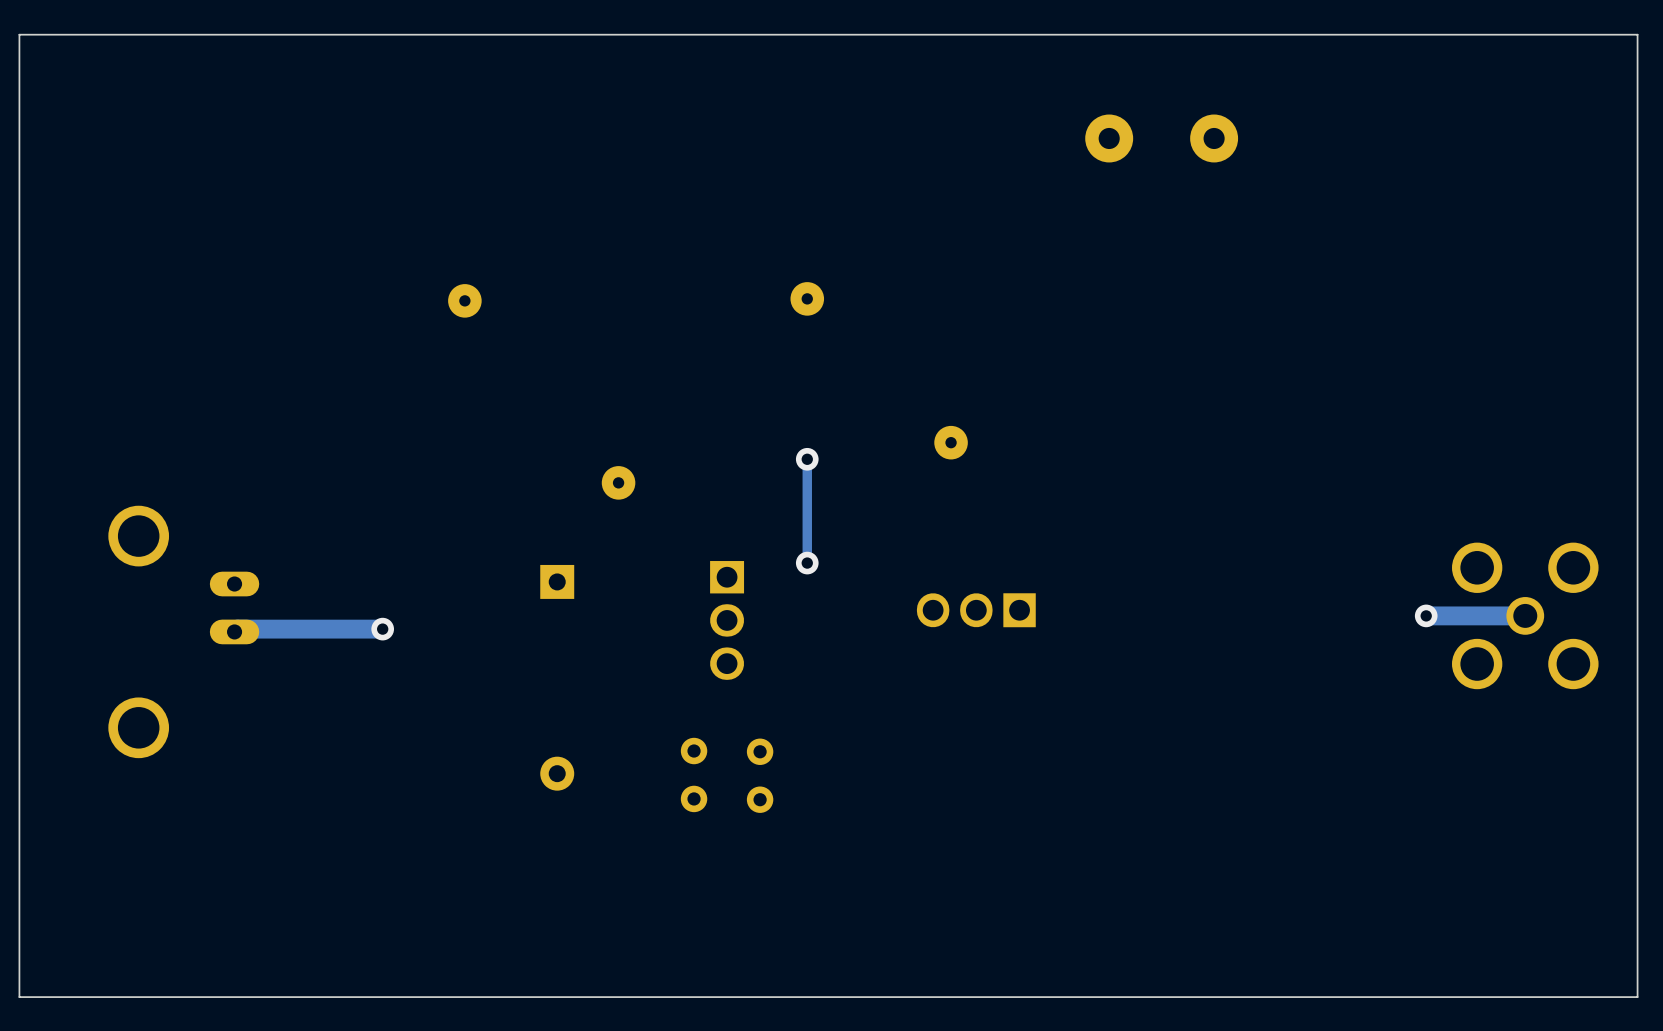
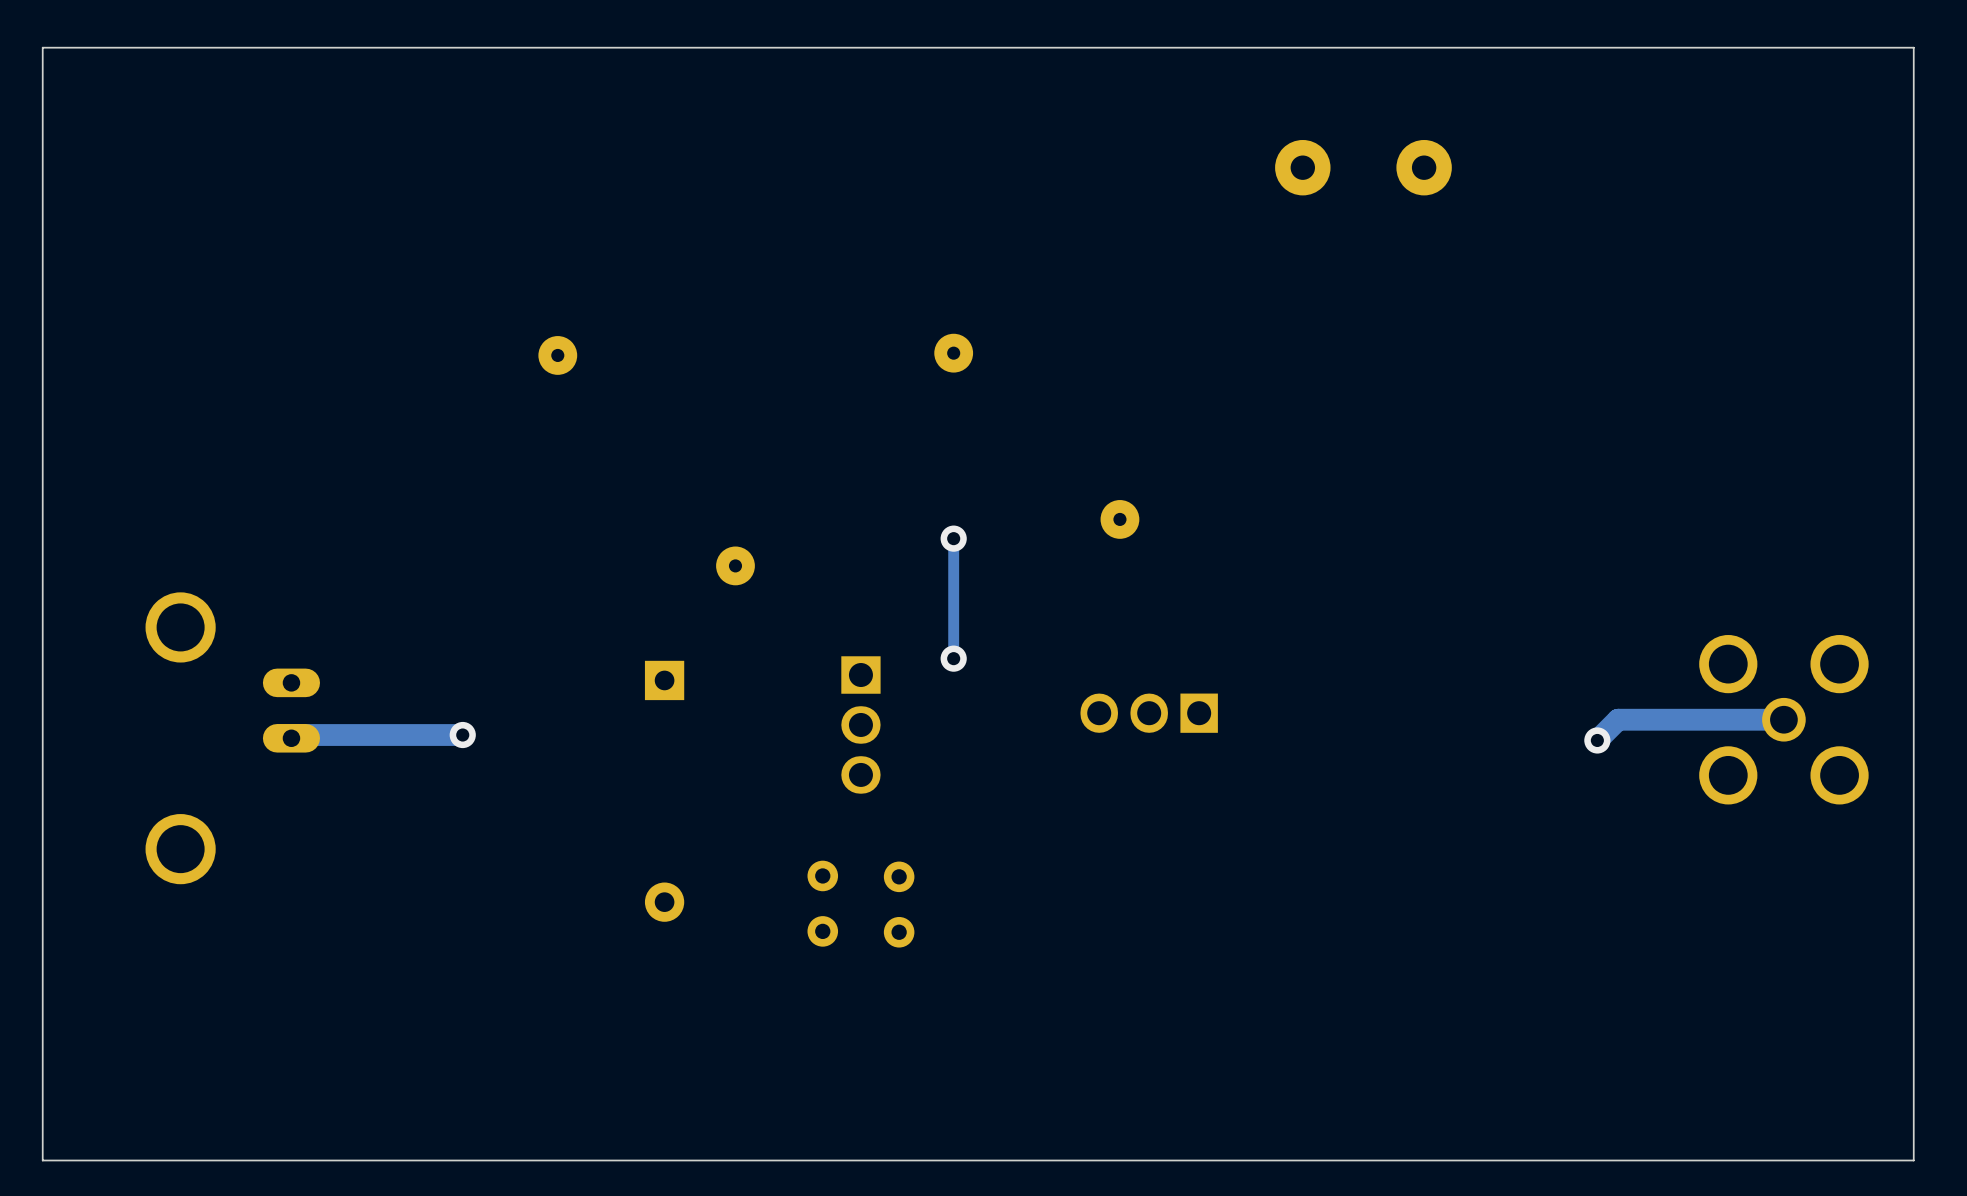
track: none -> (1669, 719) (1618, 719) (1597, 740)
via position: (1426, 615) -> (1597, 740)

